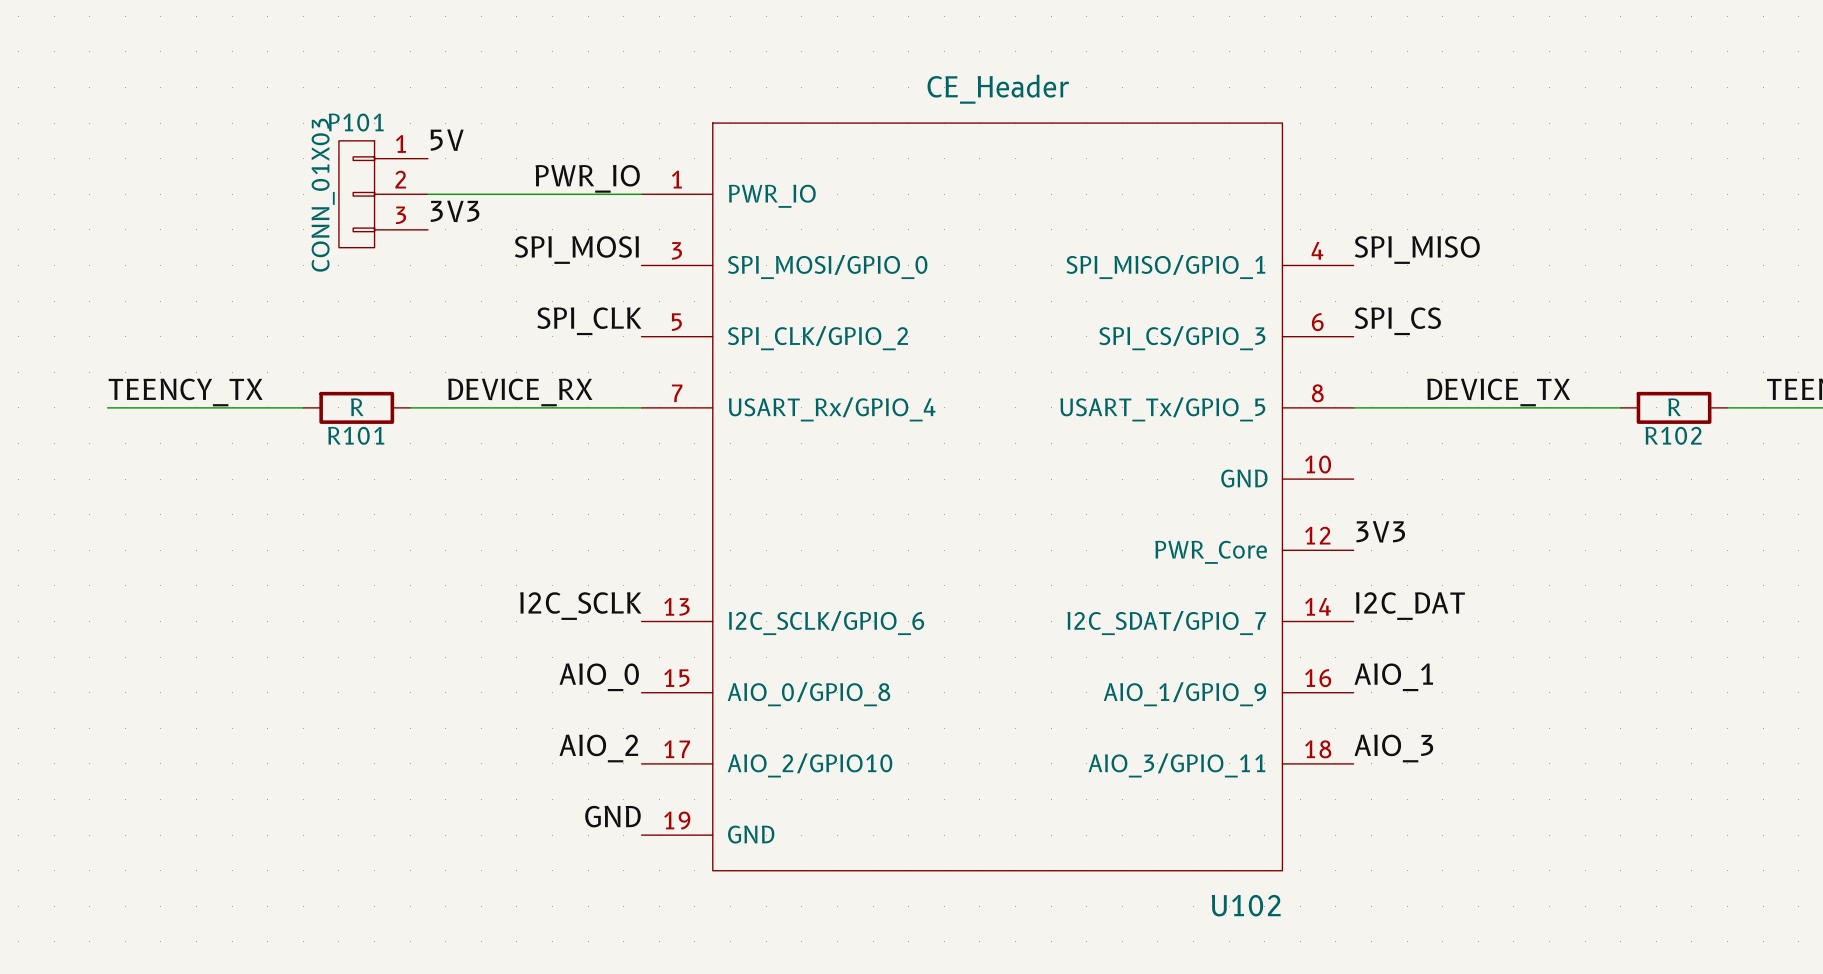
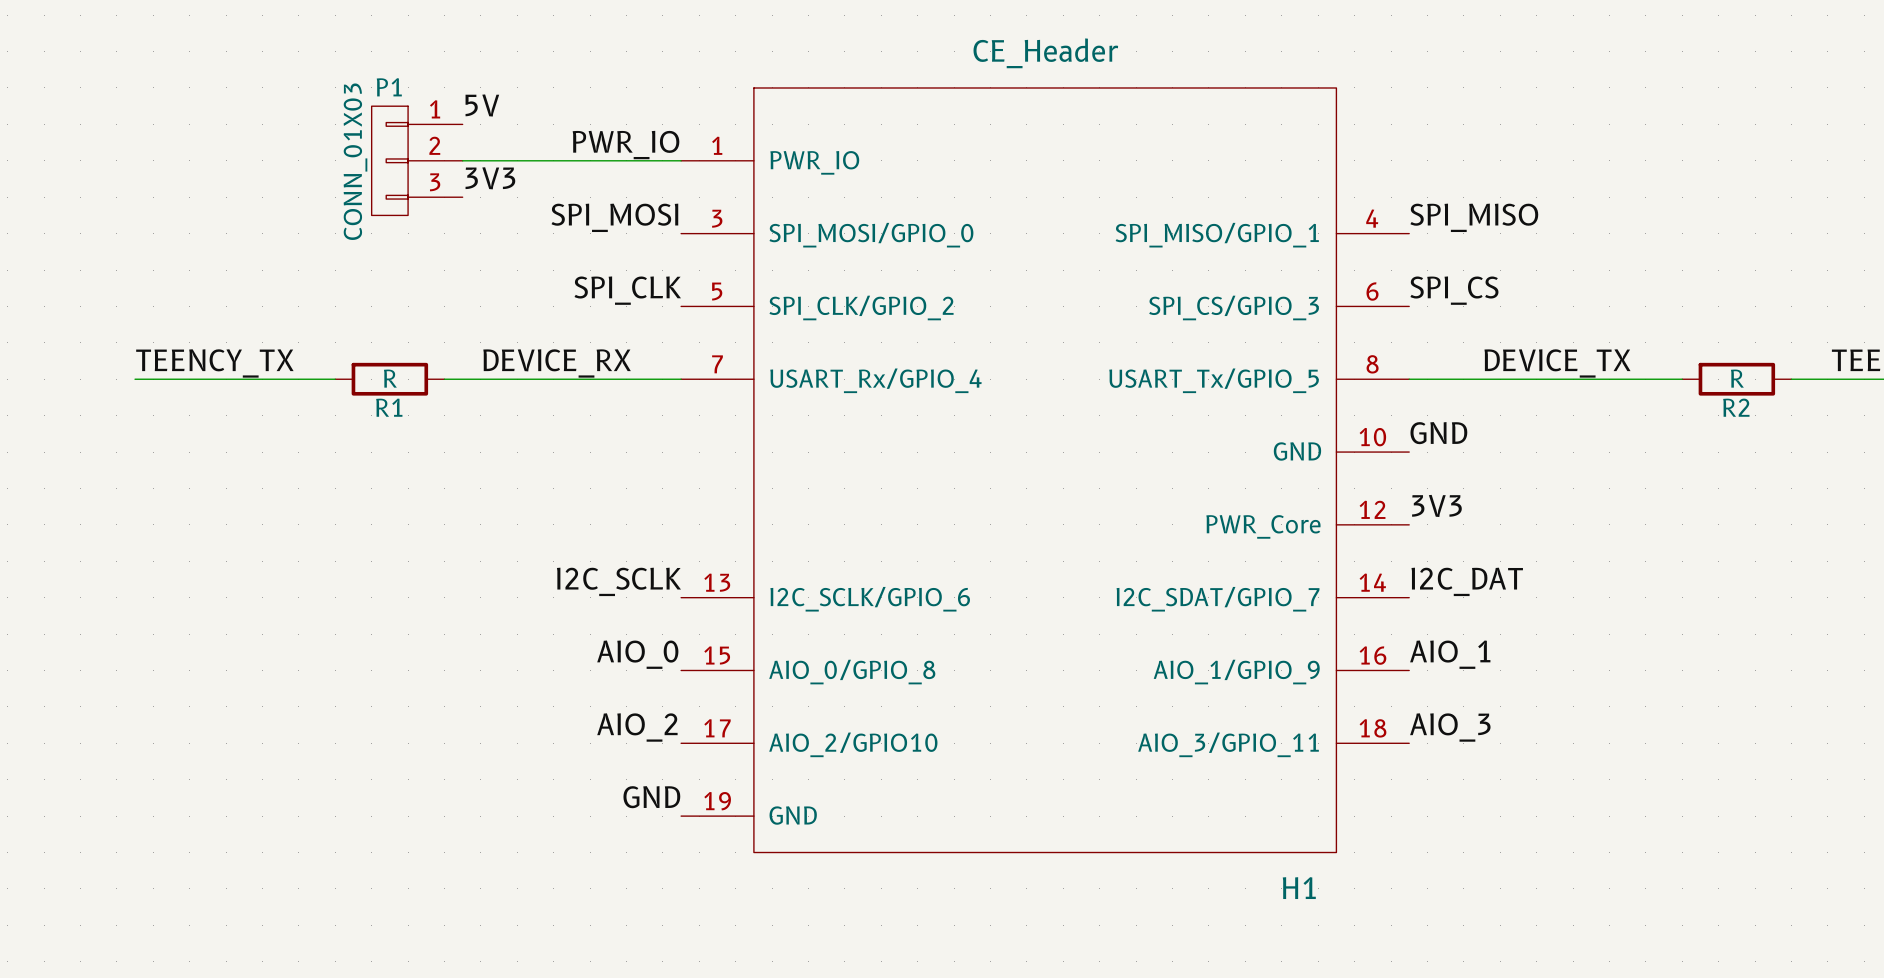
P101 name: P101 (356, 122) -> P1 (389, 87)
R101 name: R101 (356, 435) -> R1 (389, 407)
R102 name: R102 (1673, 435) -> R2 (1736, 407)
label: none -> GND (1438, 433)
U102 name: U102 (1246, 905) -> H1 (1299, 888)

